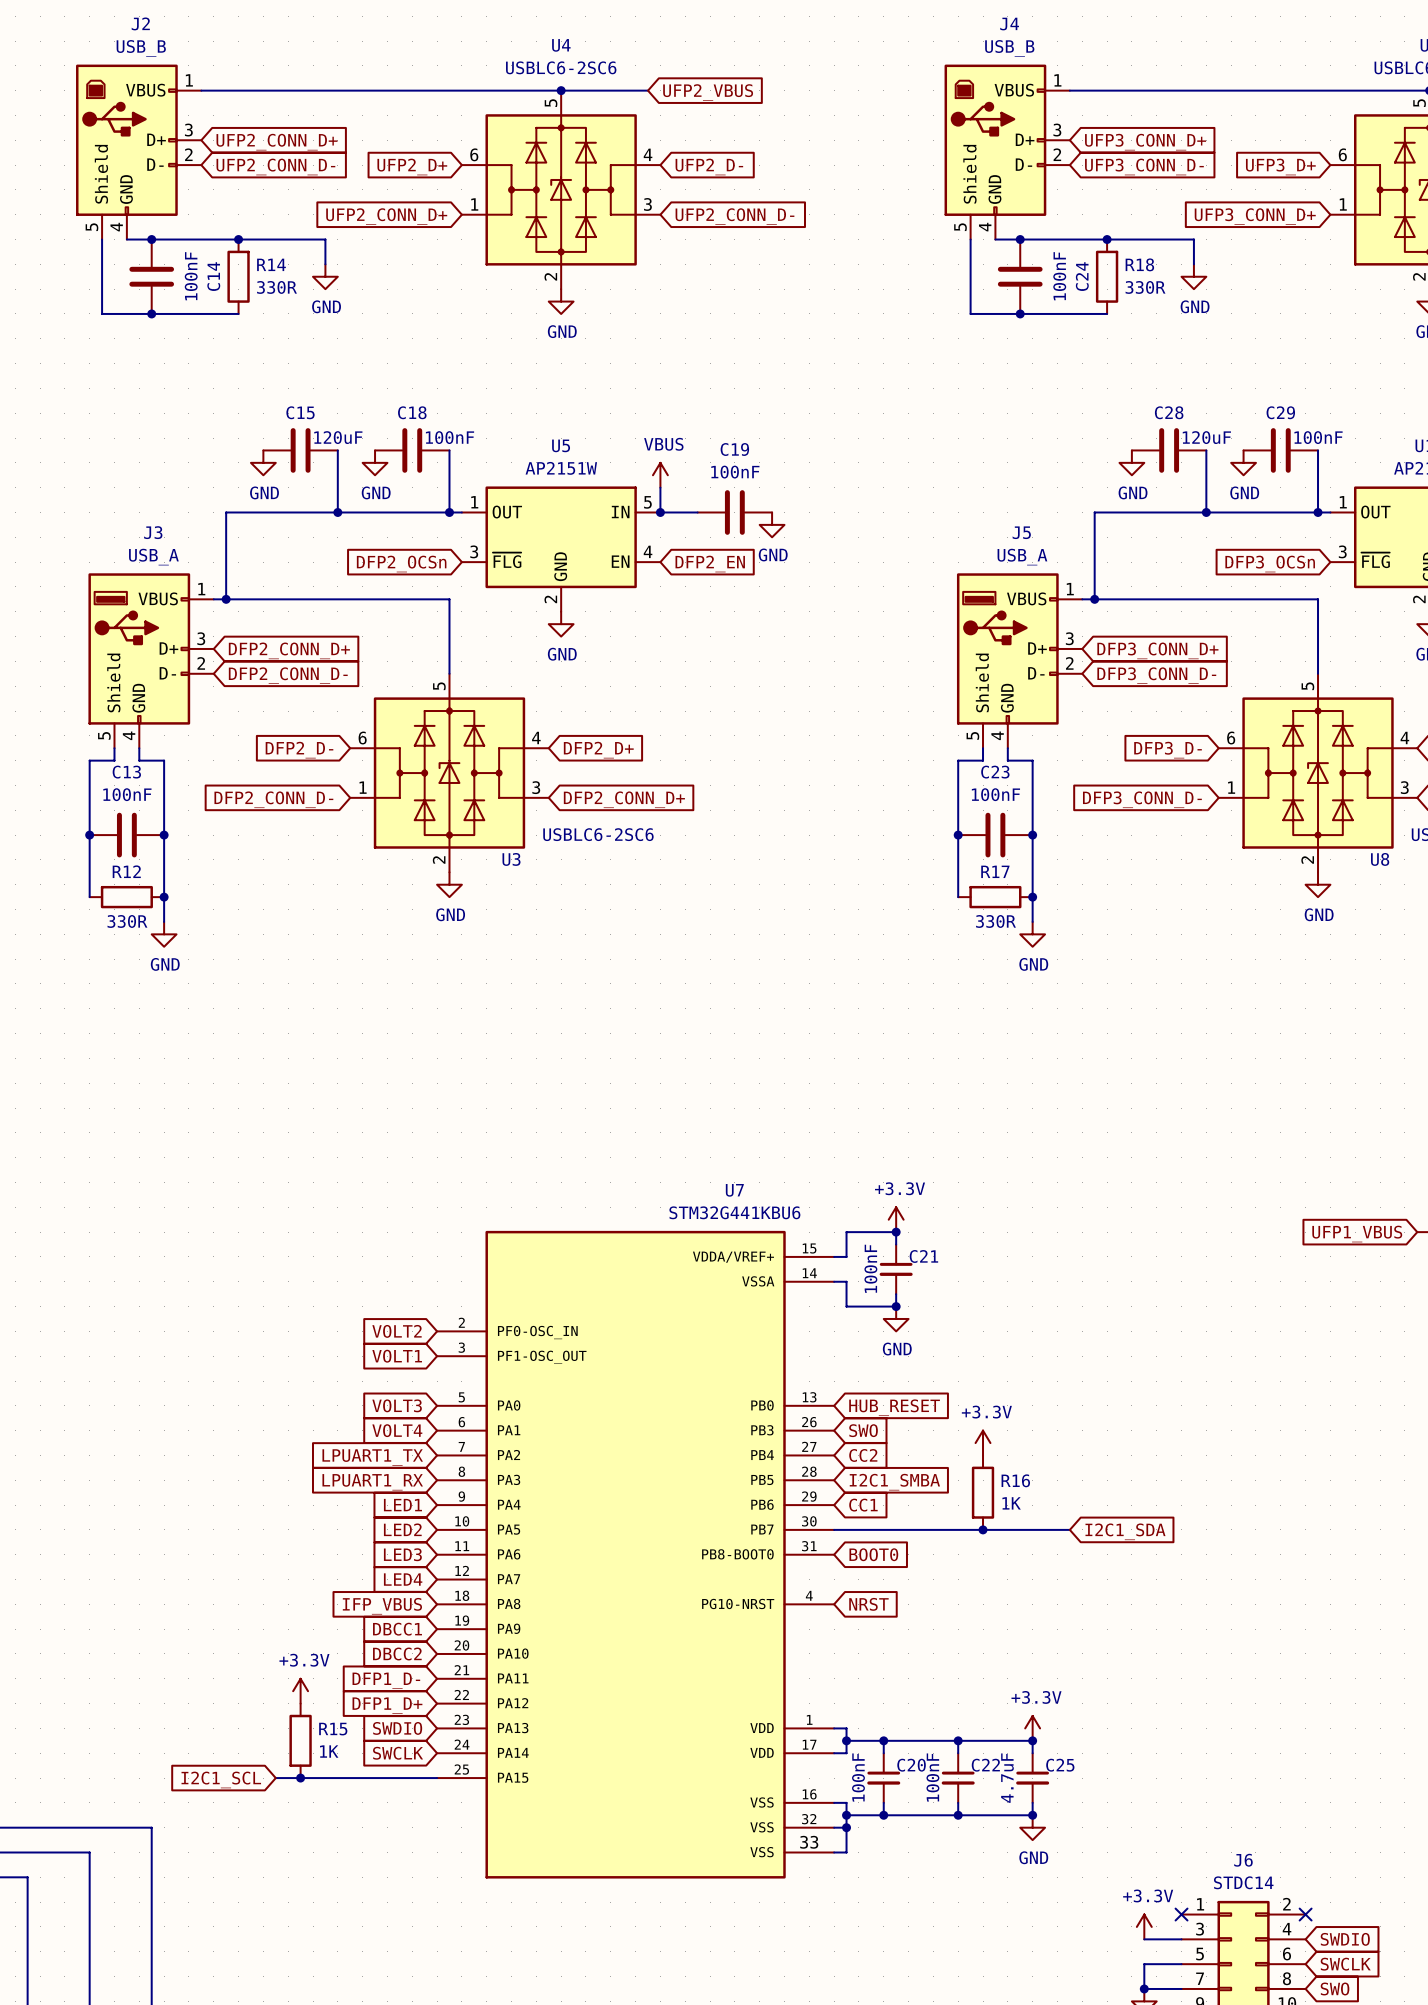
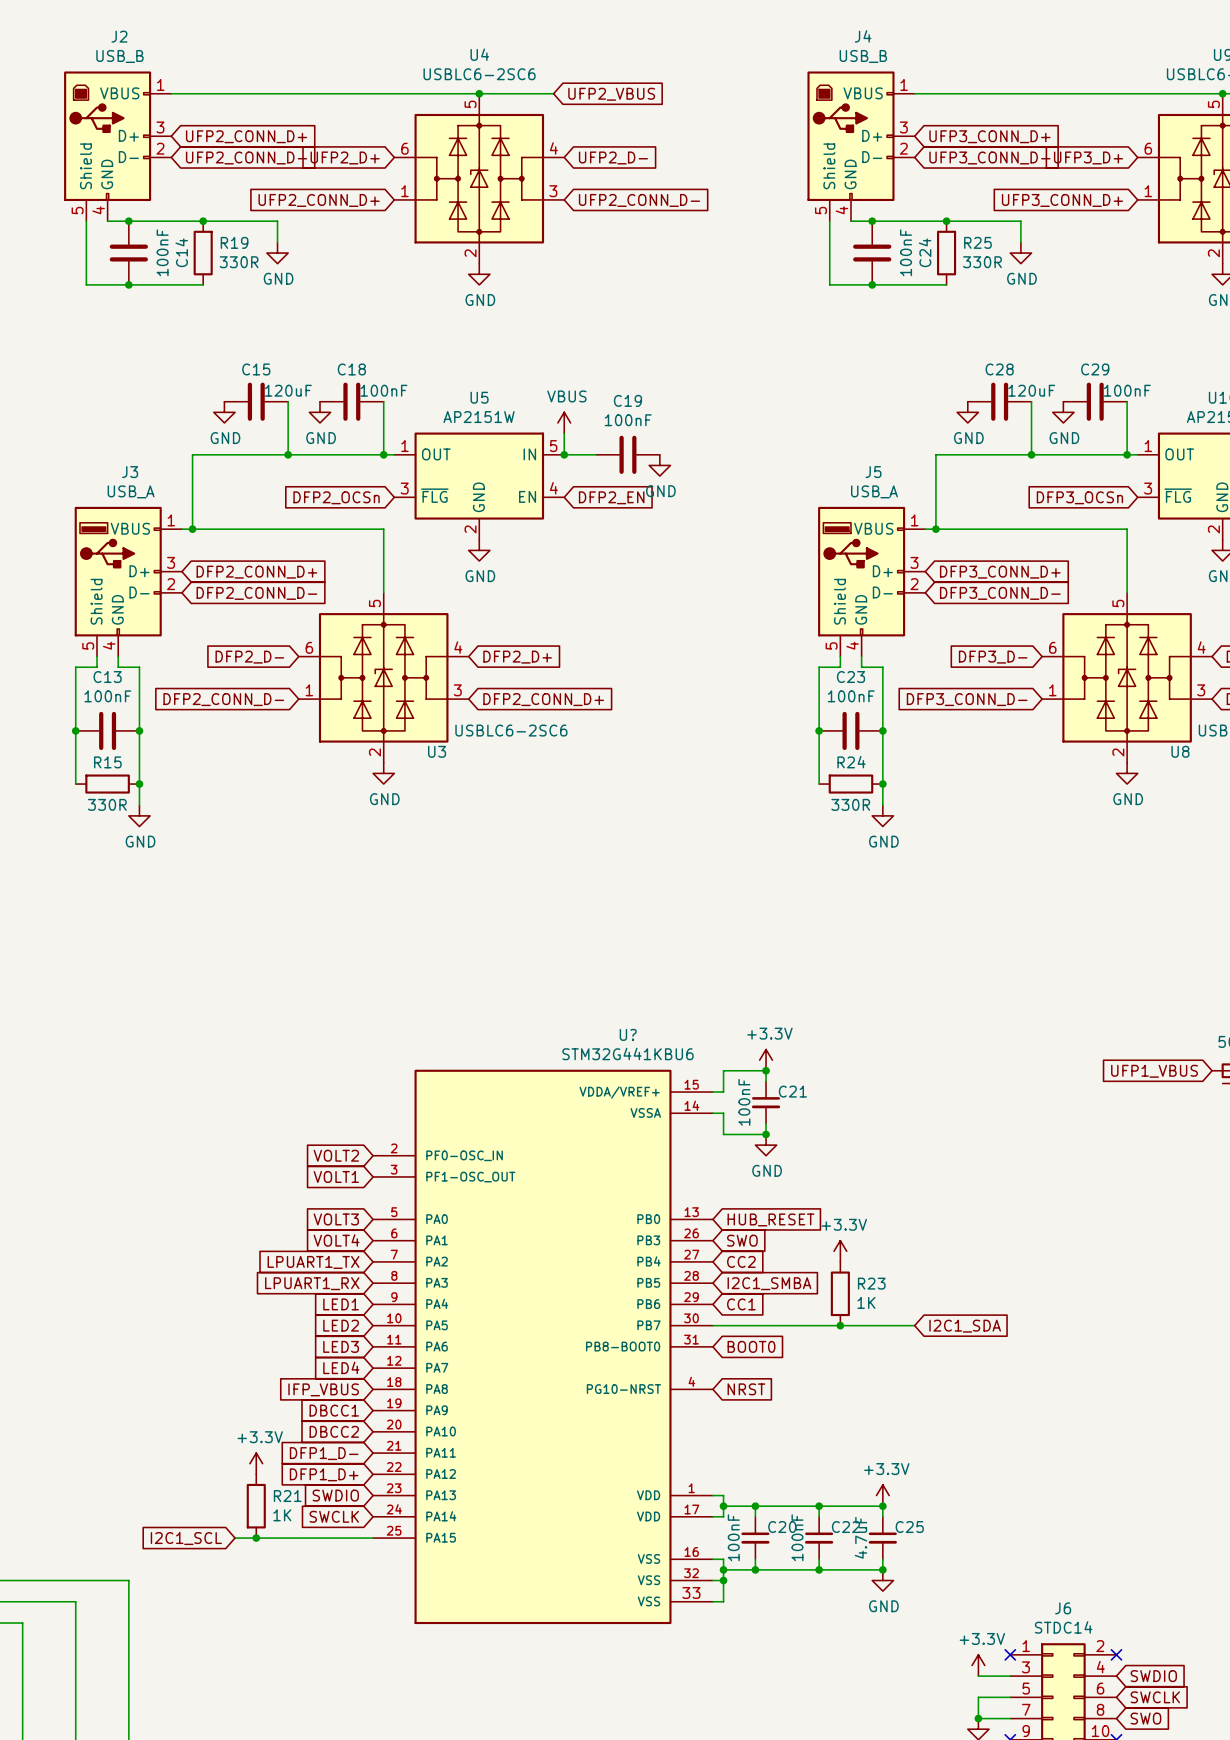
R14 name: R14 (271, 264) -> R19 (234, 242)
R18 name: R18 (1139, 264) -> R25 (977, 242)
R12 name: R12 (126, 871) -> R15 (107, 762)
R17 name: R17 (995, 871) -> R24 (851, 762)
U7 name: U7 (734, 1190) -> U? (628, 1034)
R16 name: R16 (1015, 1480) -> R23 (871, 1283)
R15 name: R15 (333, 1729) -> R21 (287, 1496)

